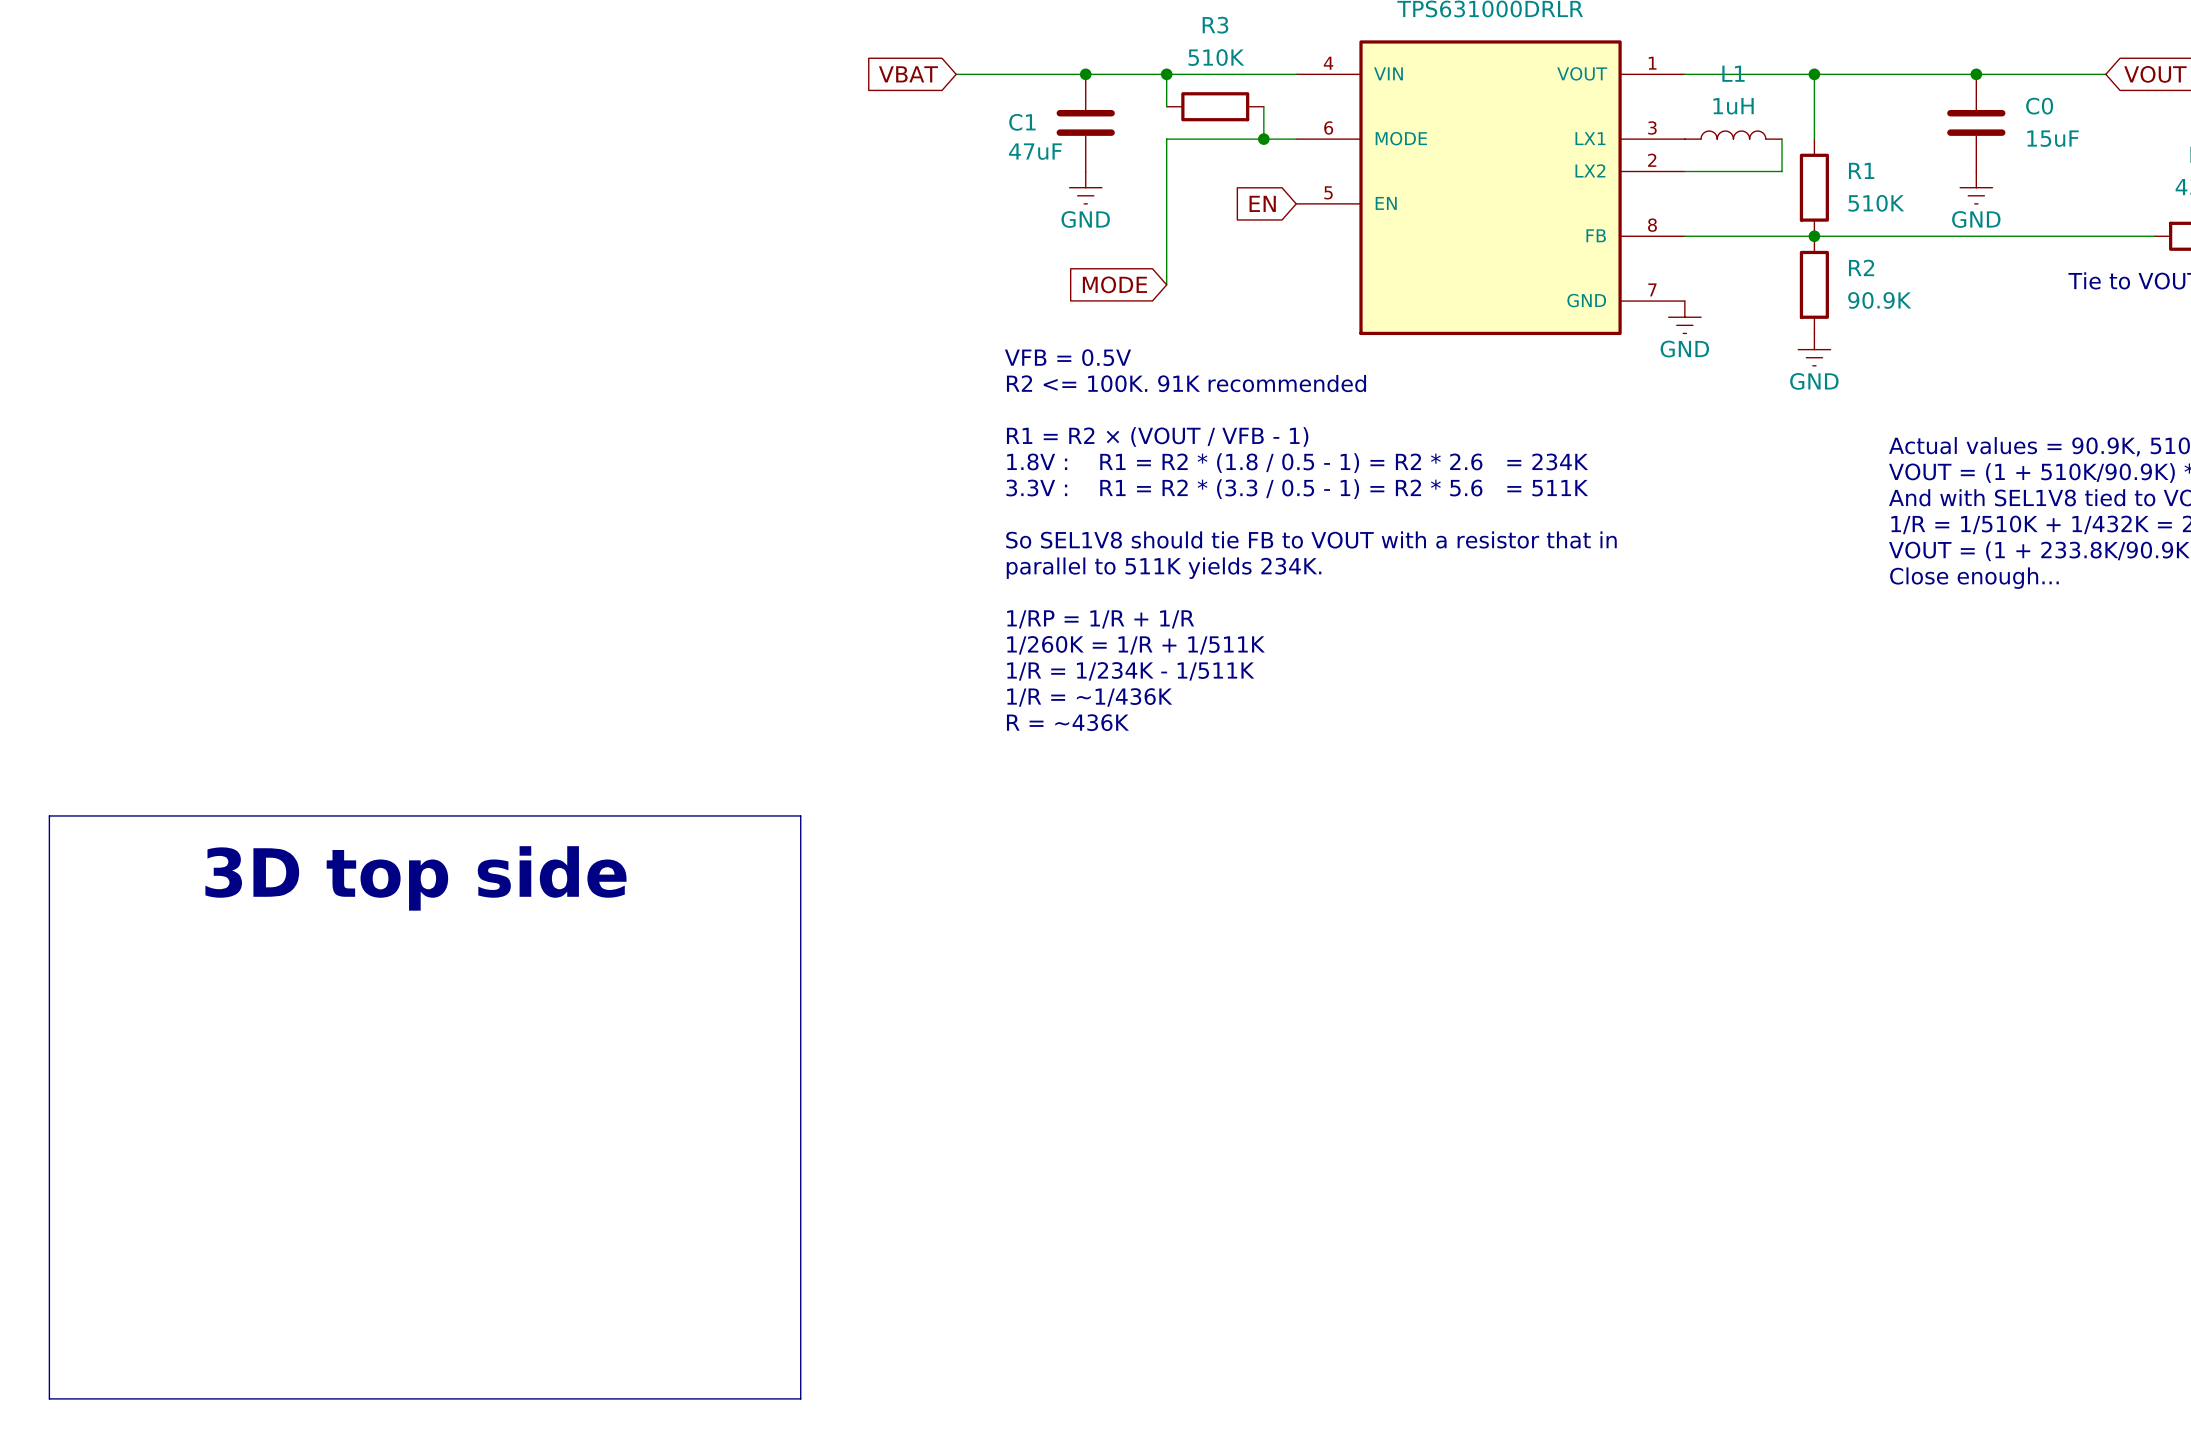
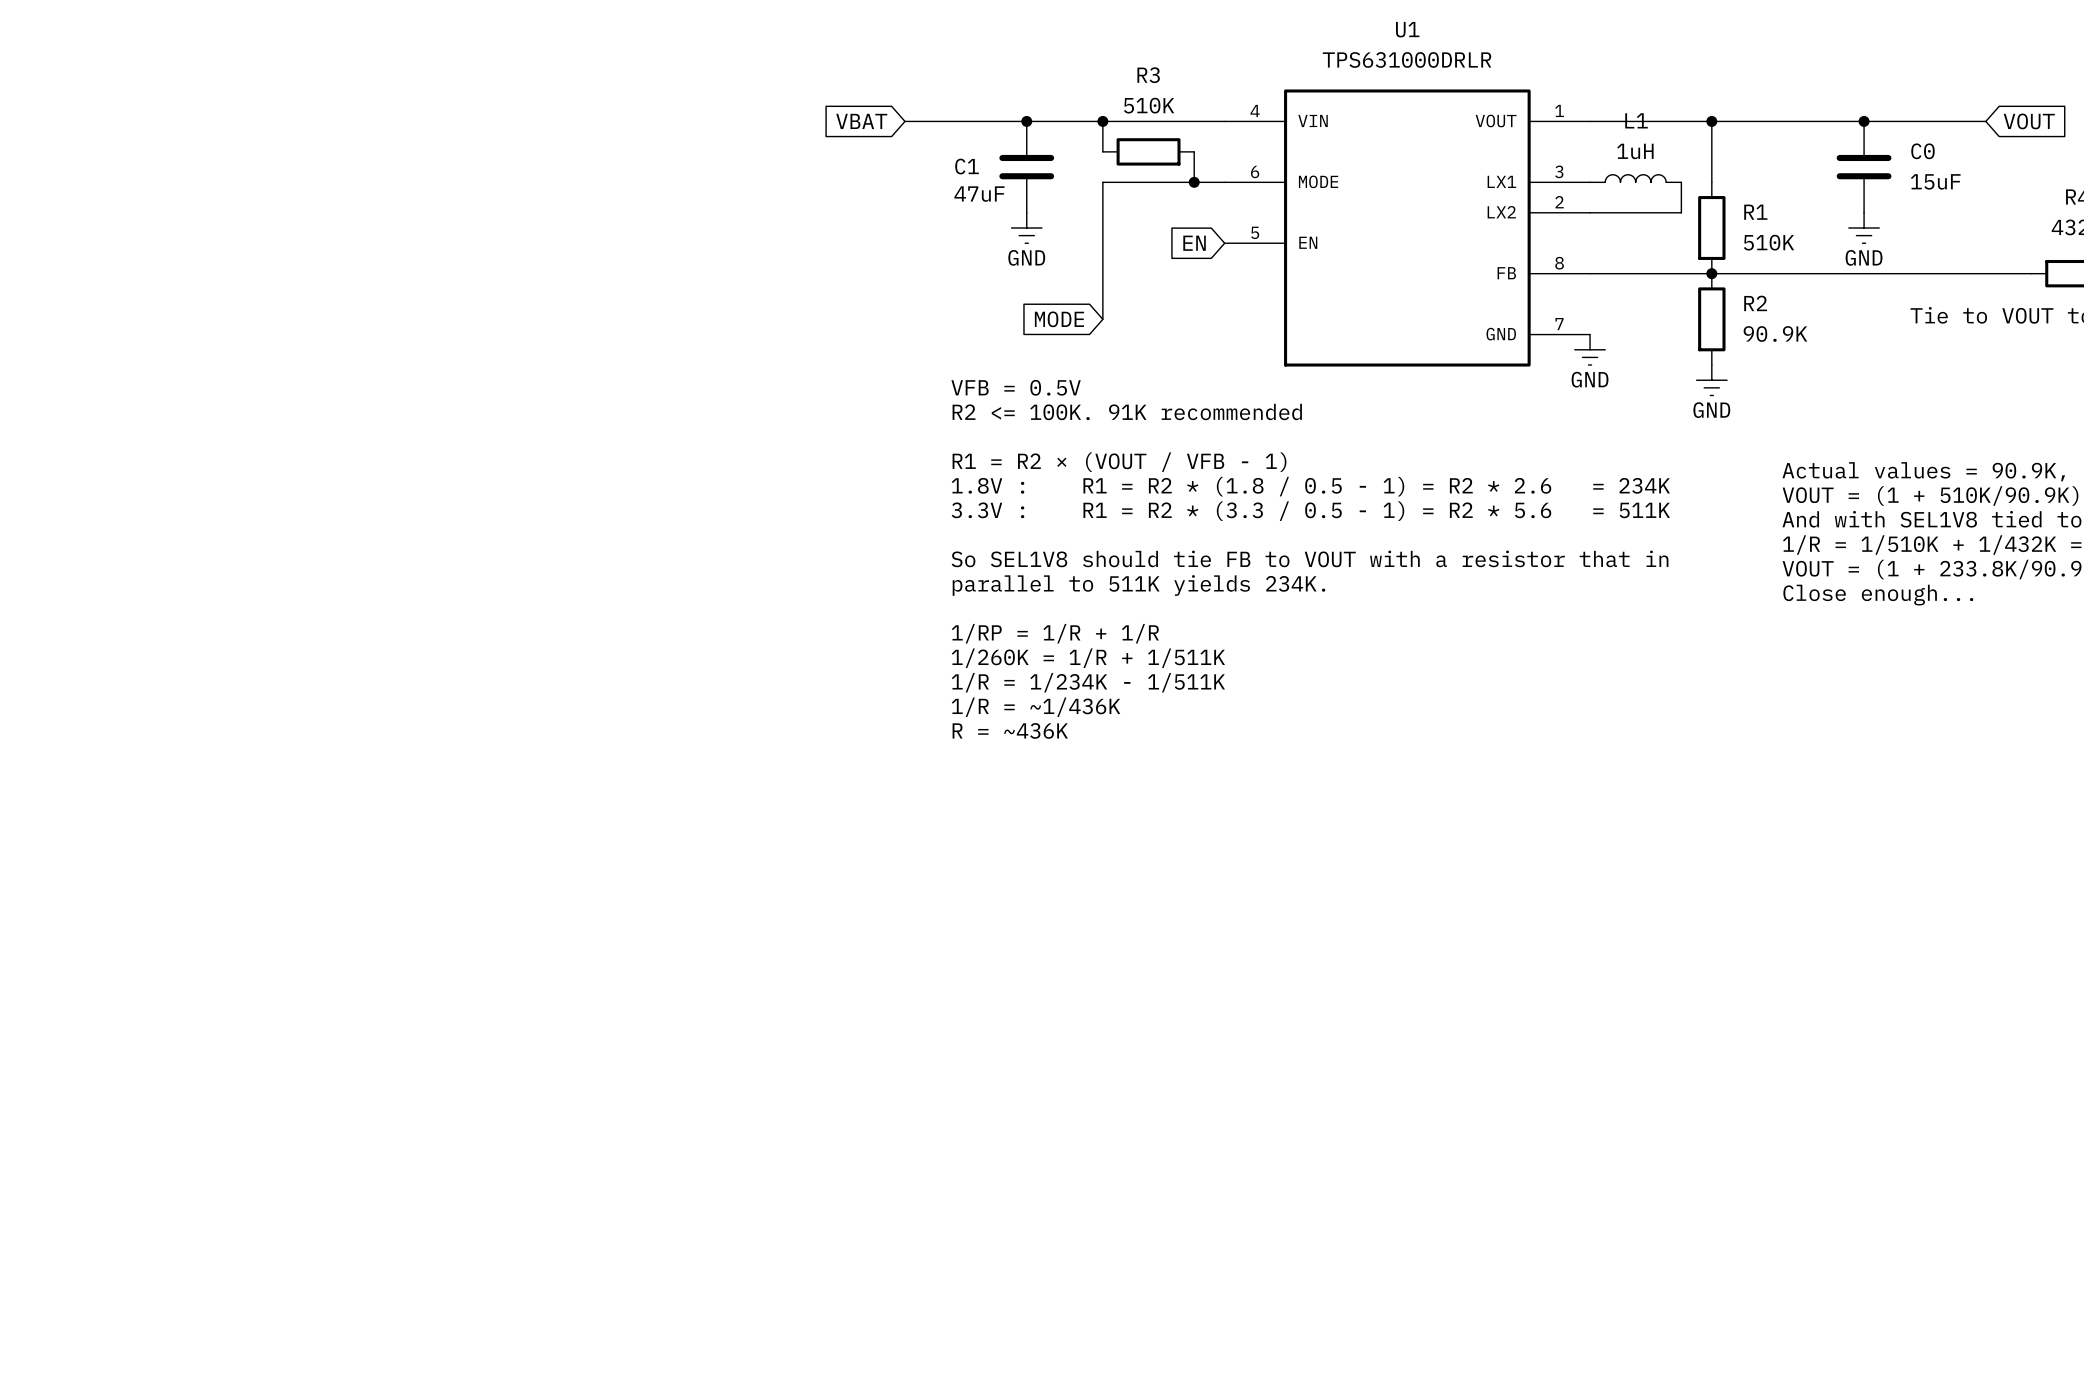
line: (49, 815) (800, 815) (800, 1398) (49, 1398) (49, 815) -> none
text: 3D top side (415, 878) -> none

